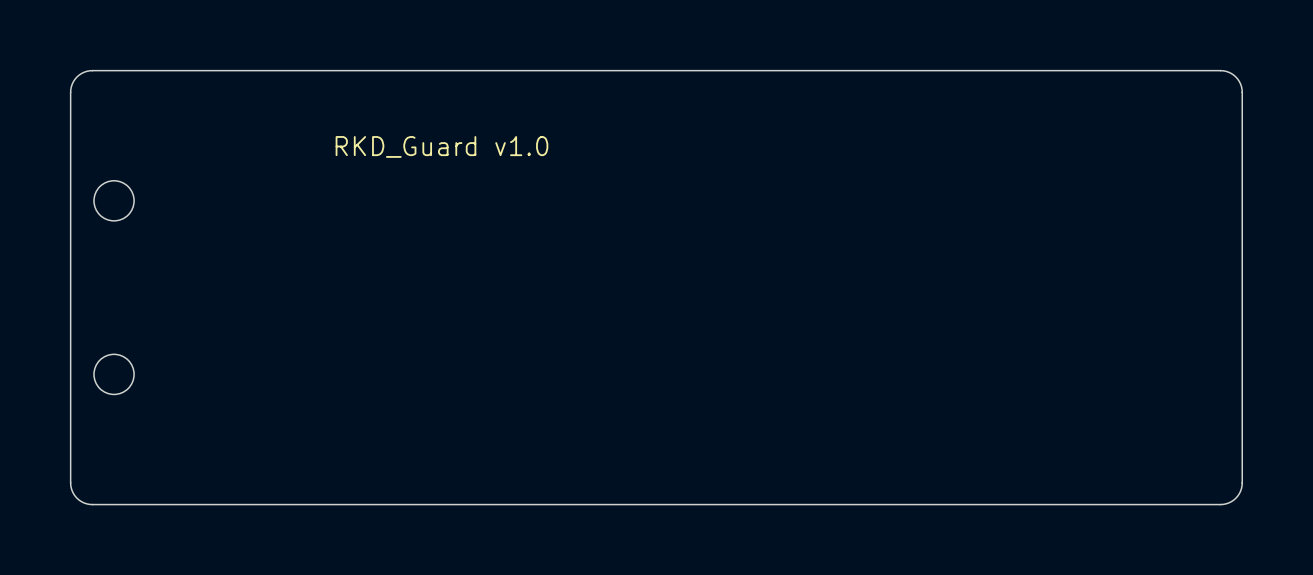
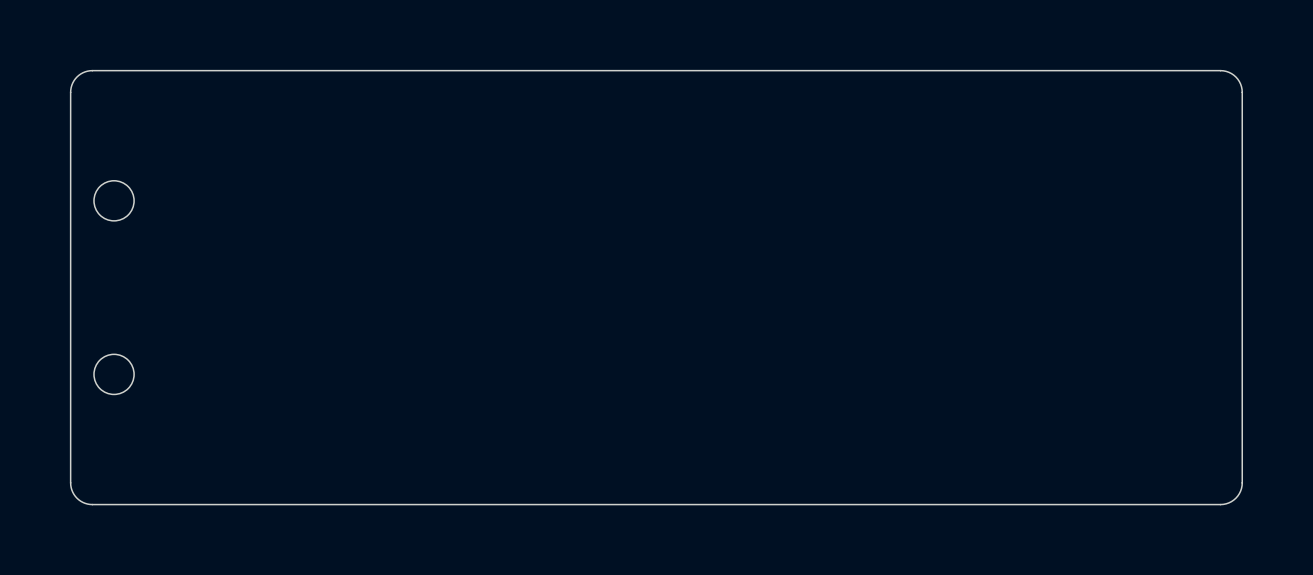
text: RKD_Guard v1.0 (441, 146) -> none

